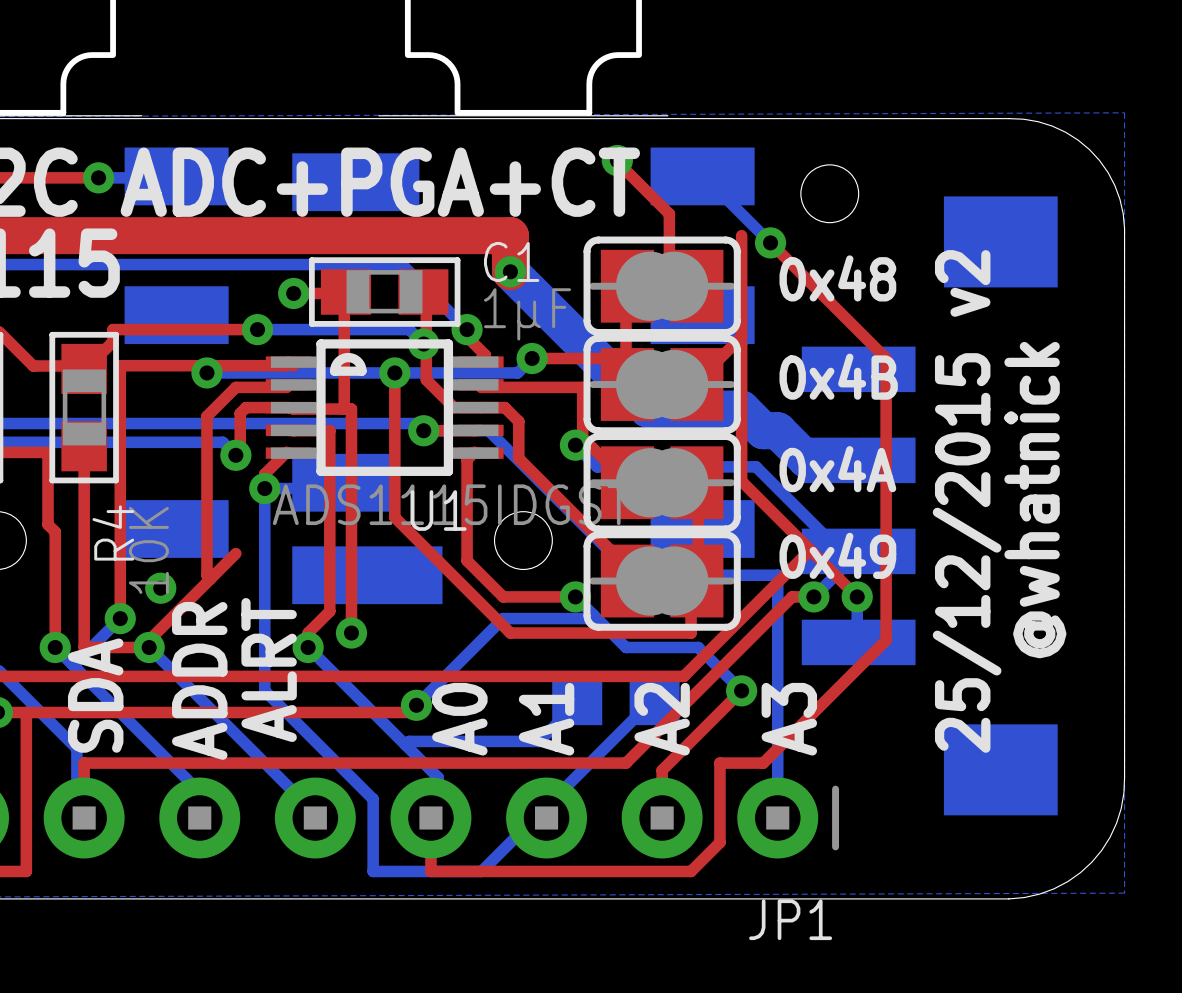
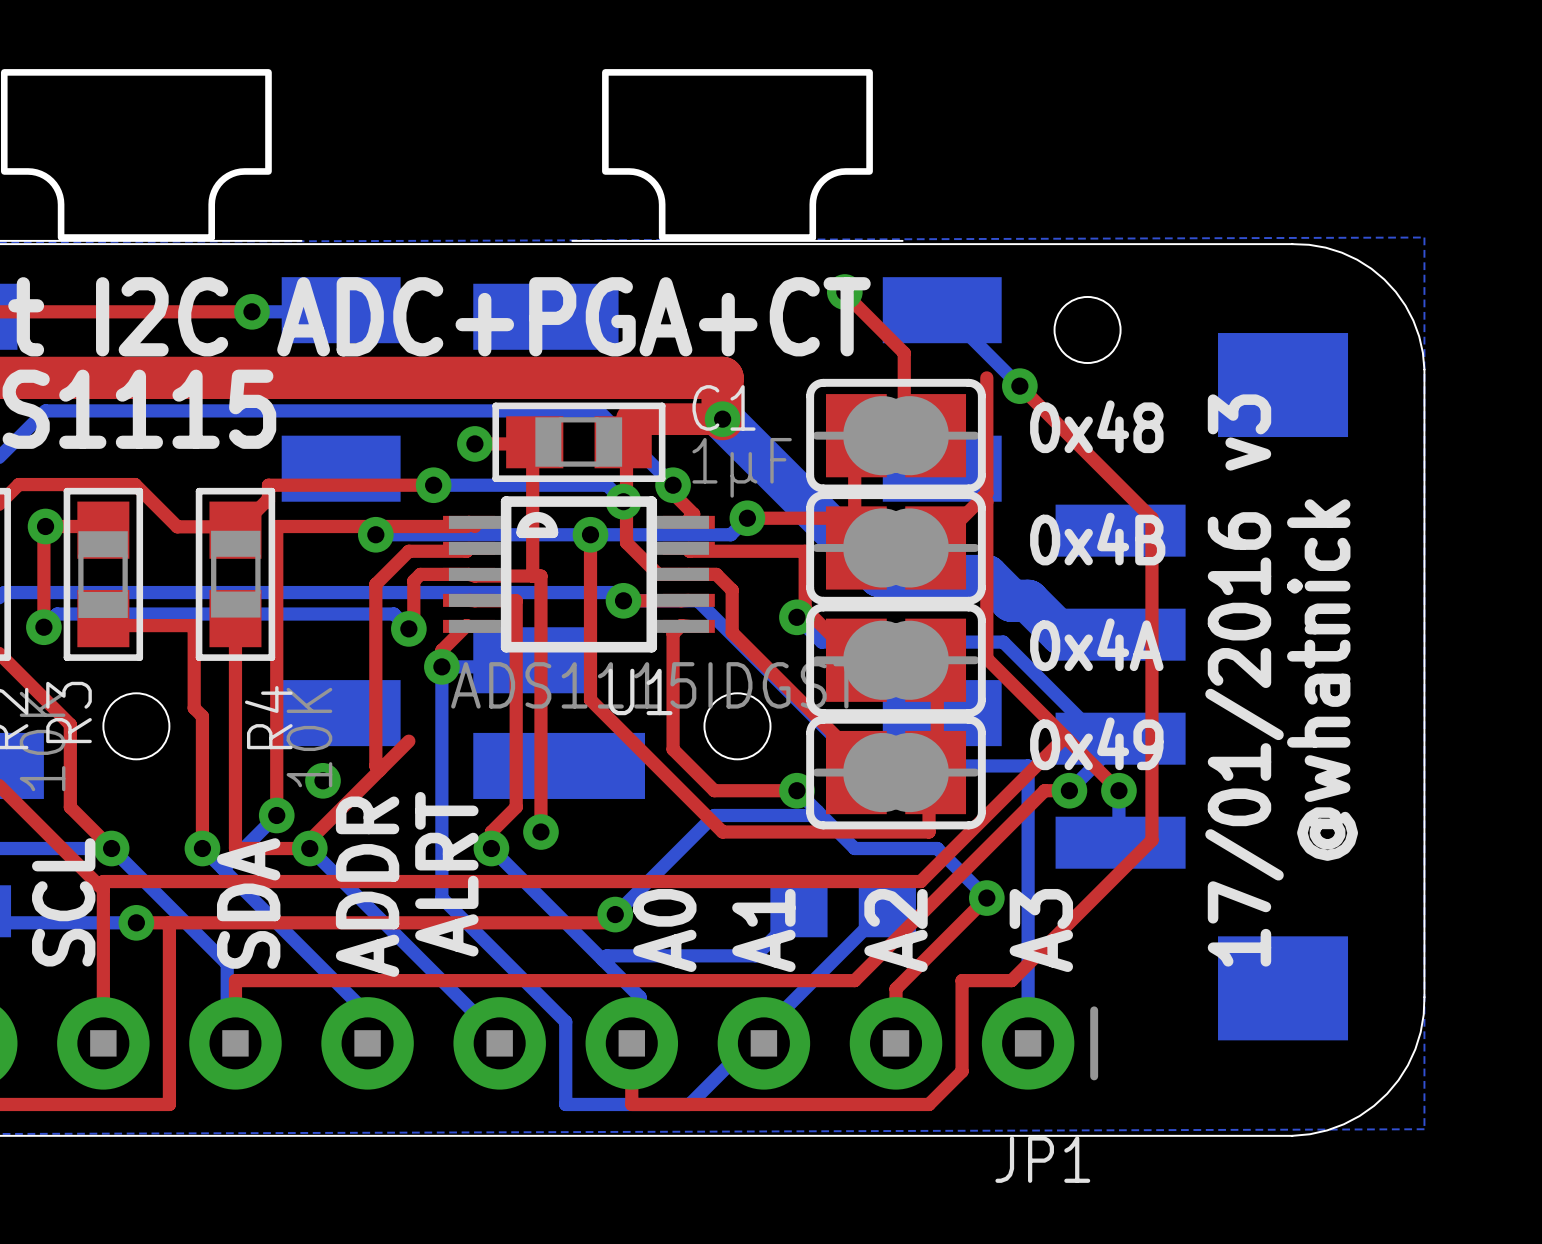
top track: none -> (722, 419) (631, 419) (631, 435) (623, 442)
text: 25/12/2015 v2 (967, 501) -> 17/01/2016 v3 (1244, 680)

